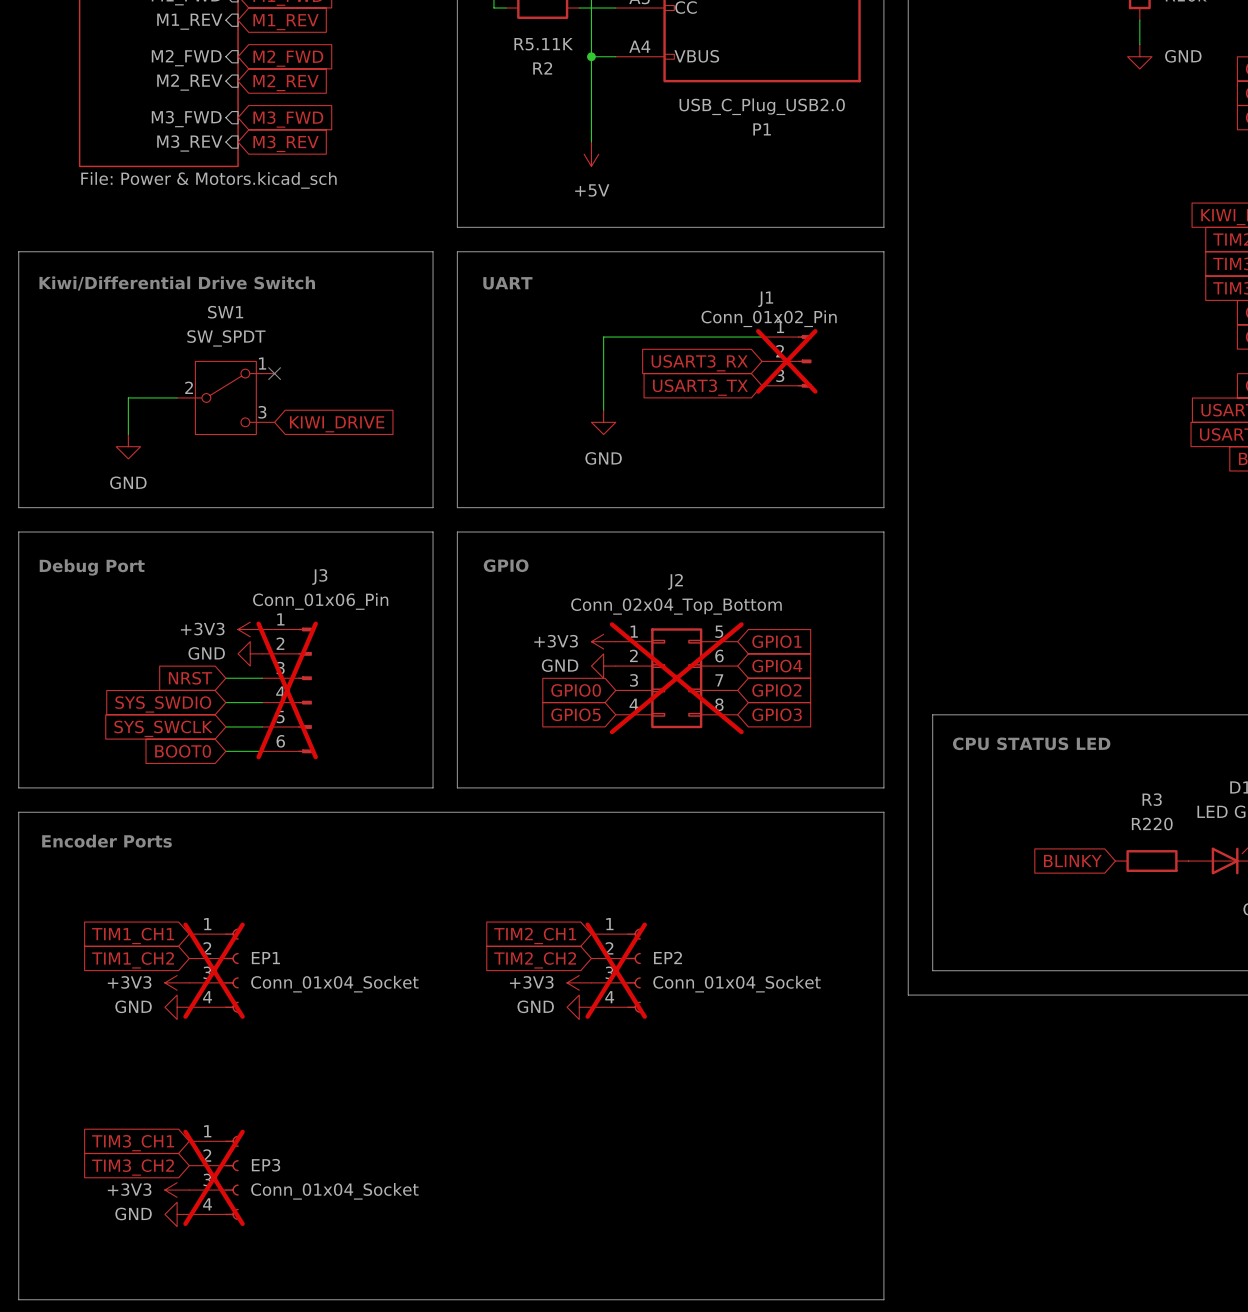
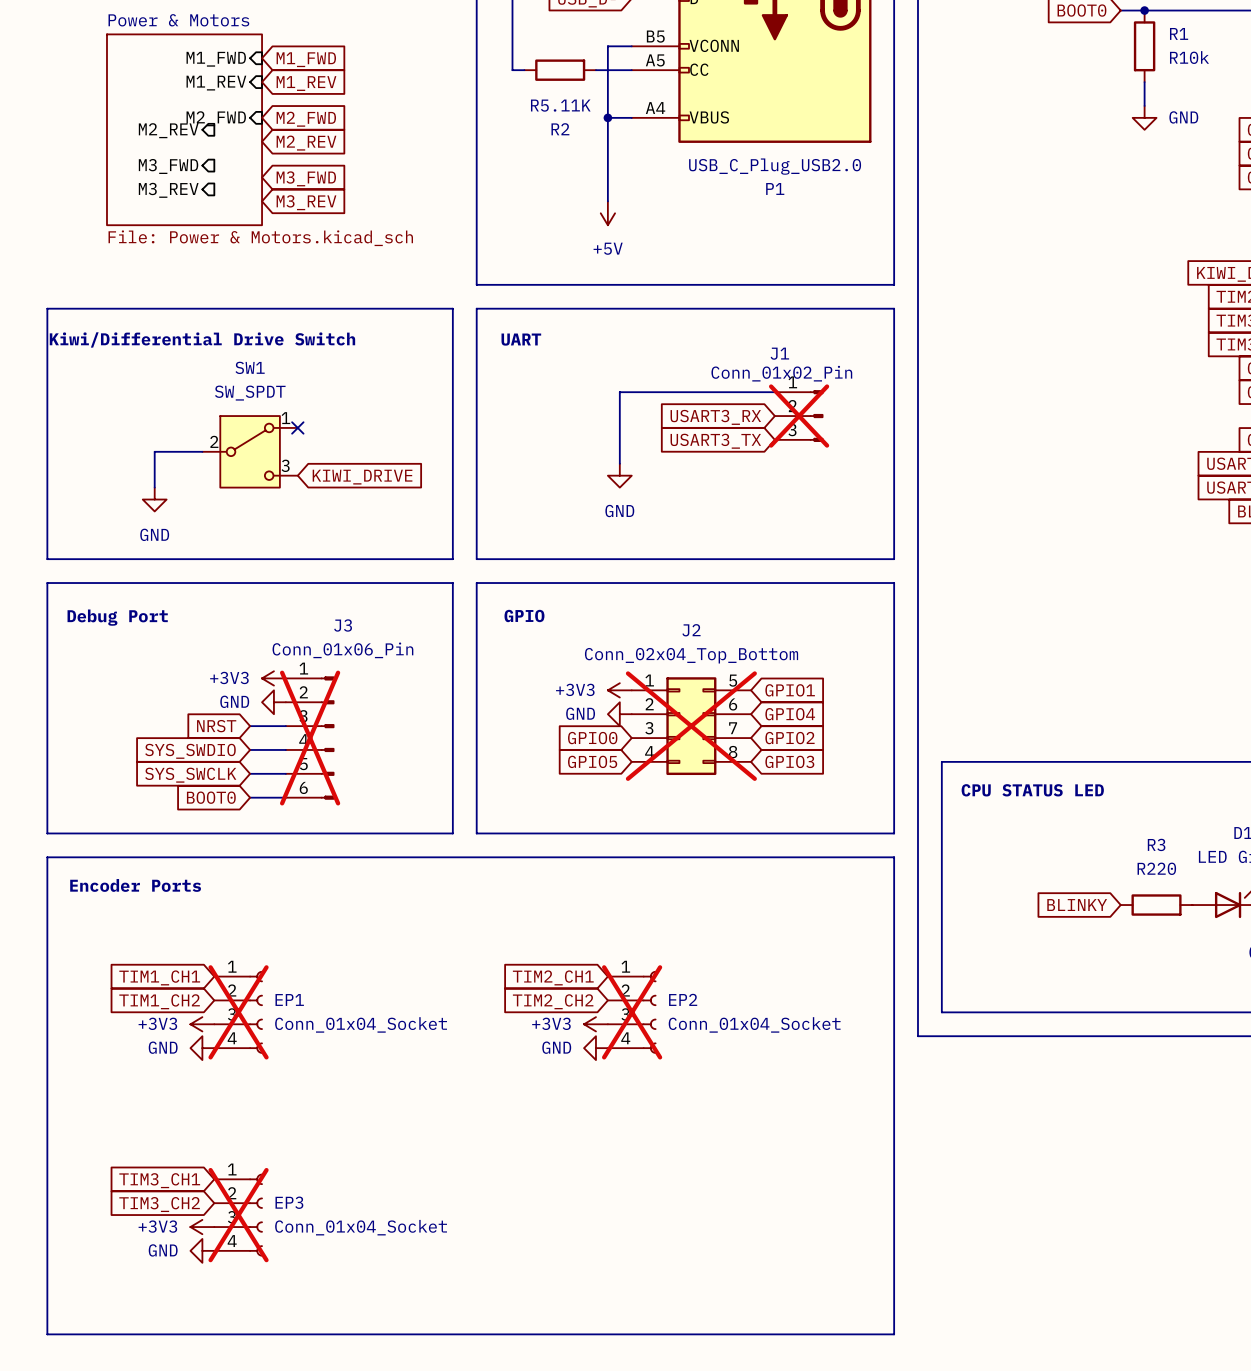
sheet pin position: M2_REV (189, 82) -> M2_REV (168, 130)
sheet pin position: M3_FWD (186, 119) -> M3_FWD (168, 166)
sheet pin position: M3_REV (189, 143) -> M3_REV (168, 190)

